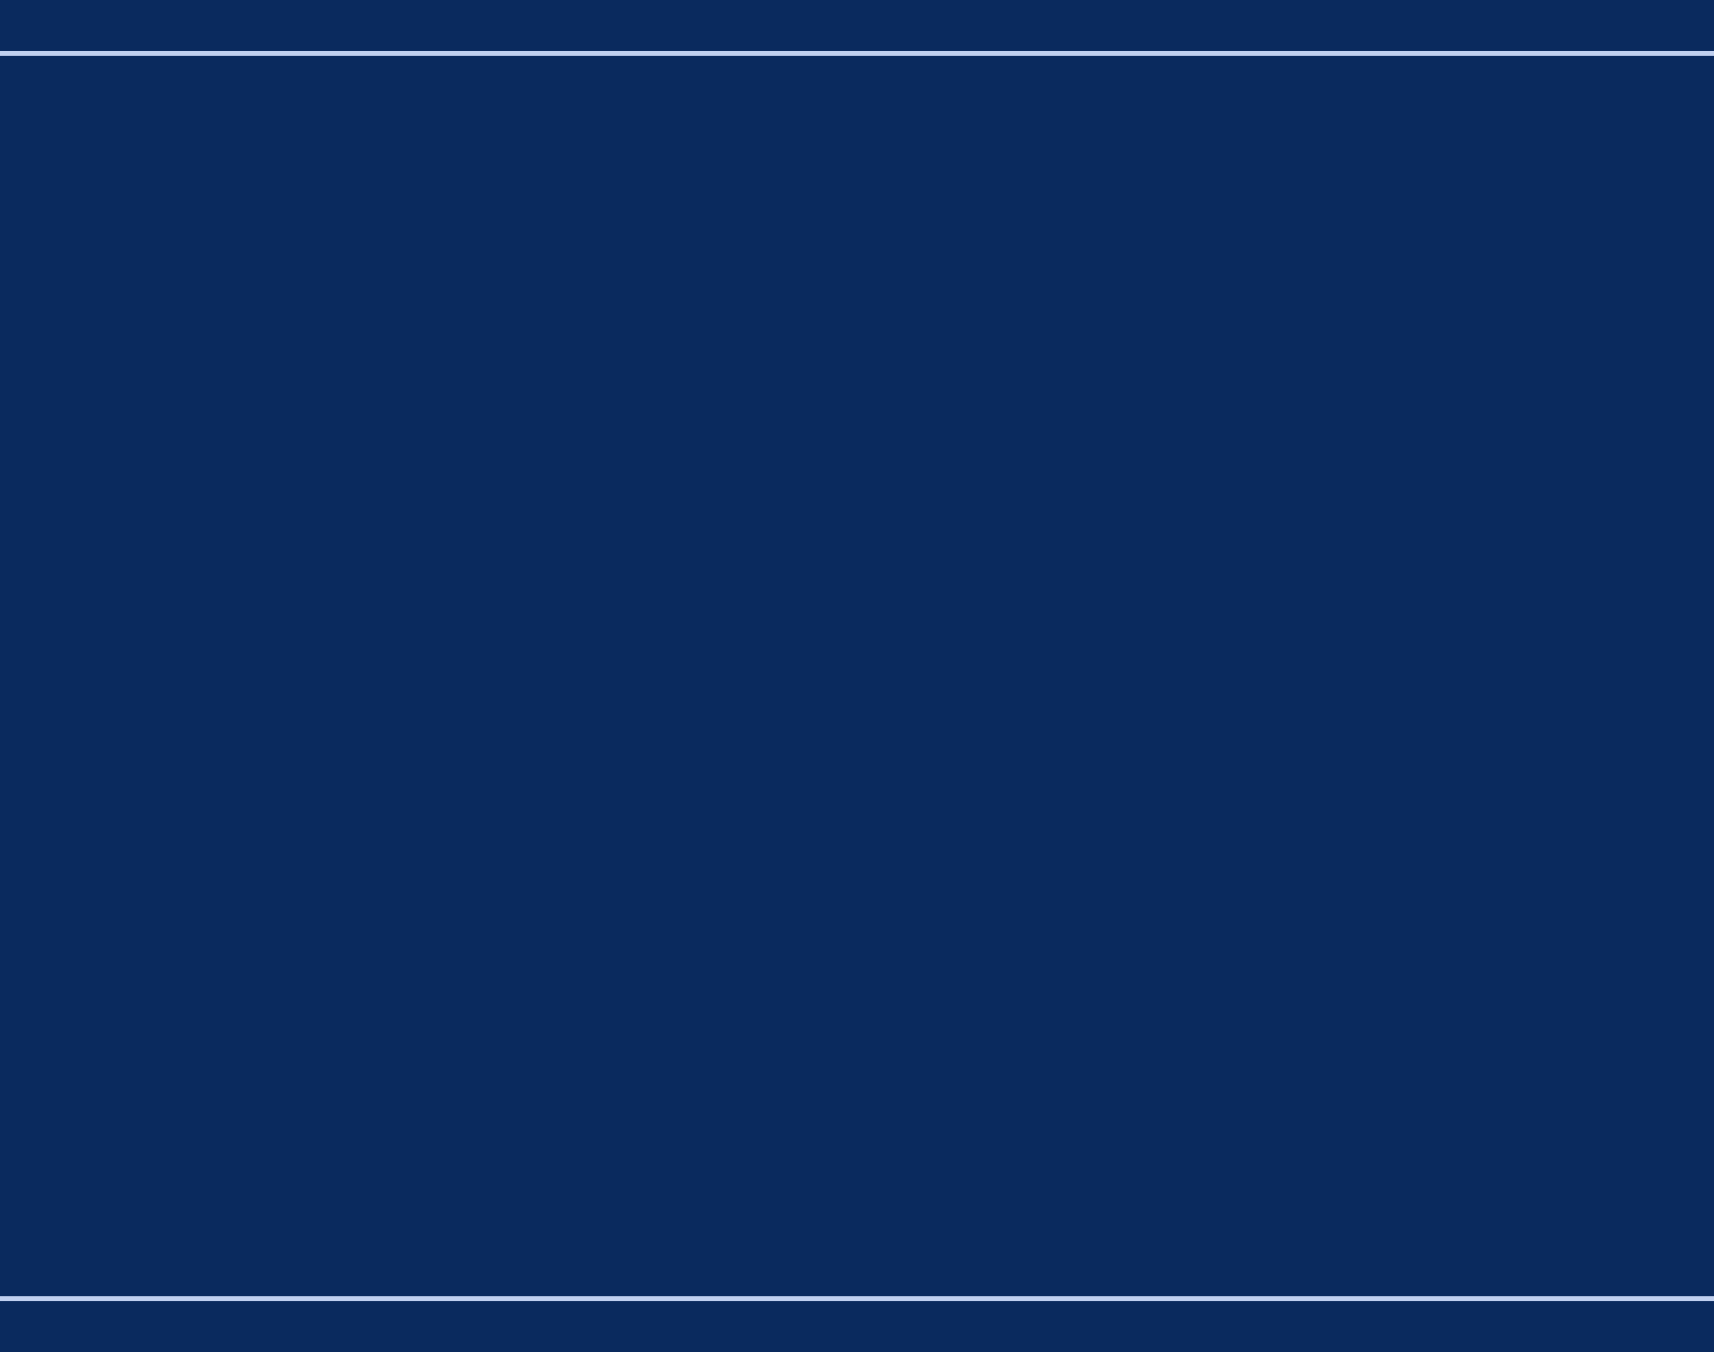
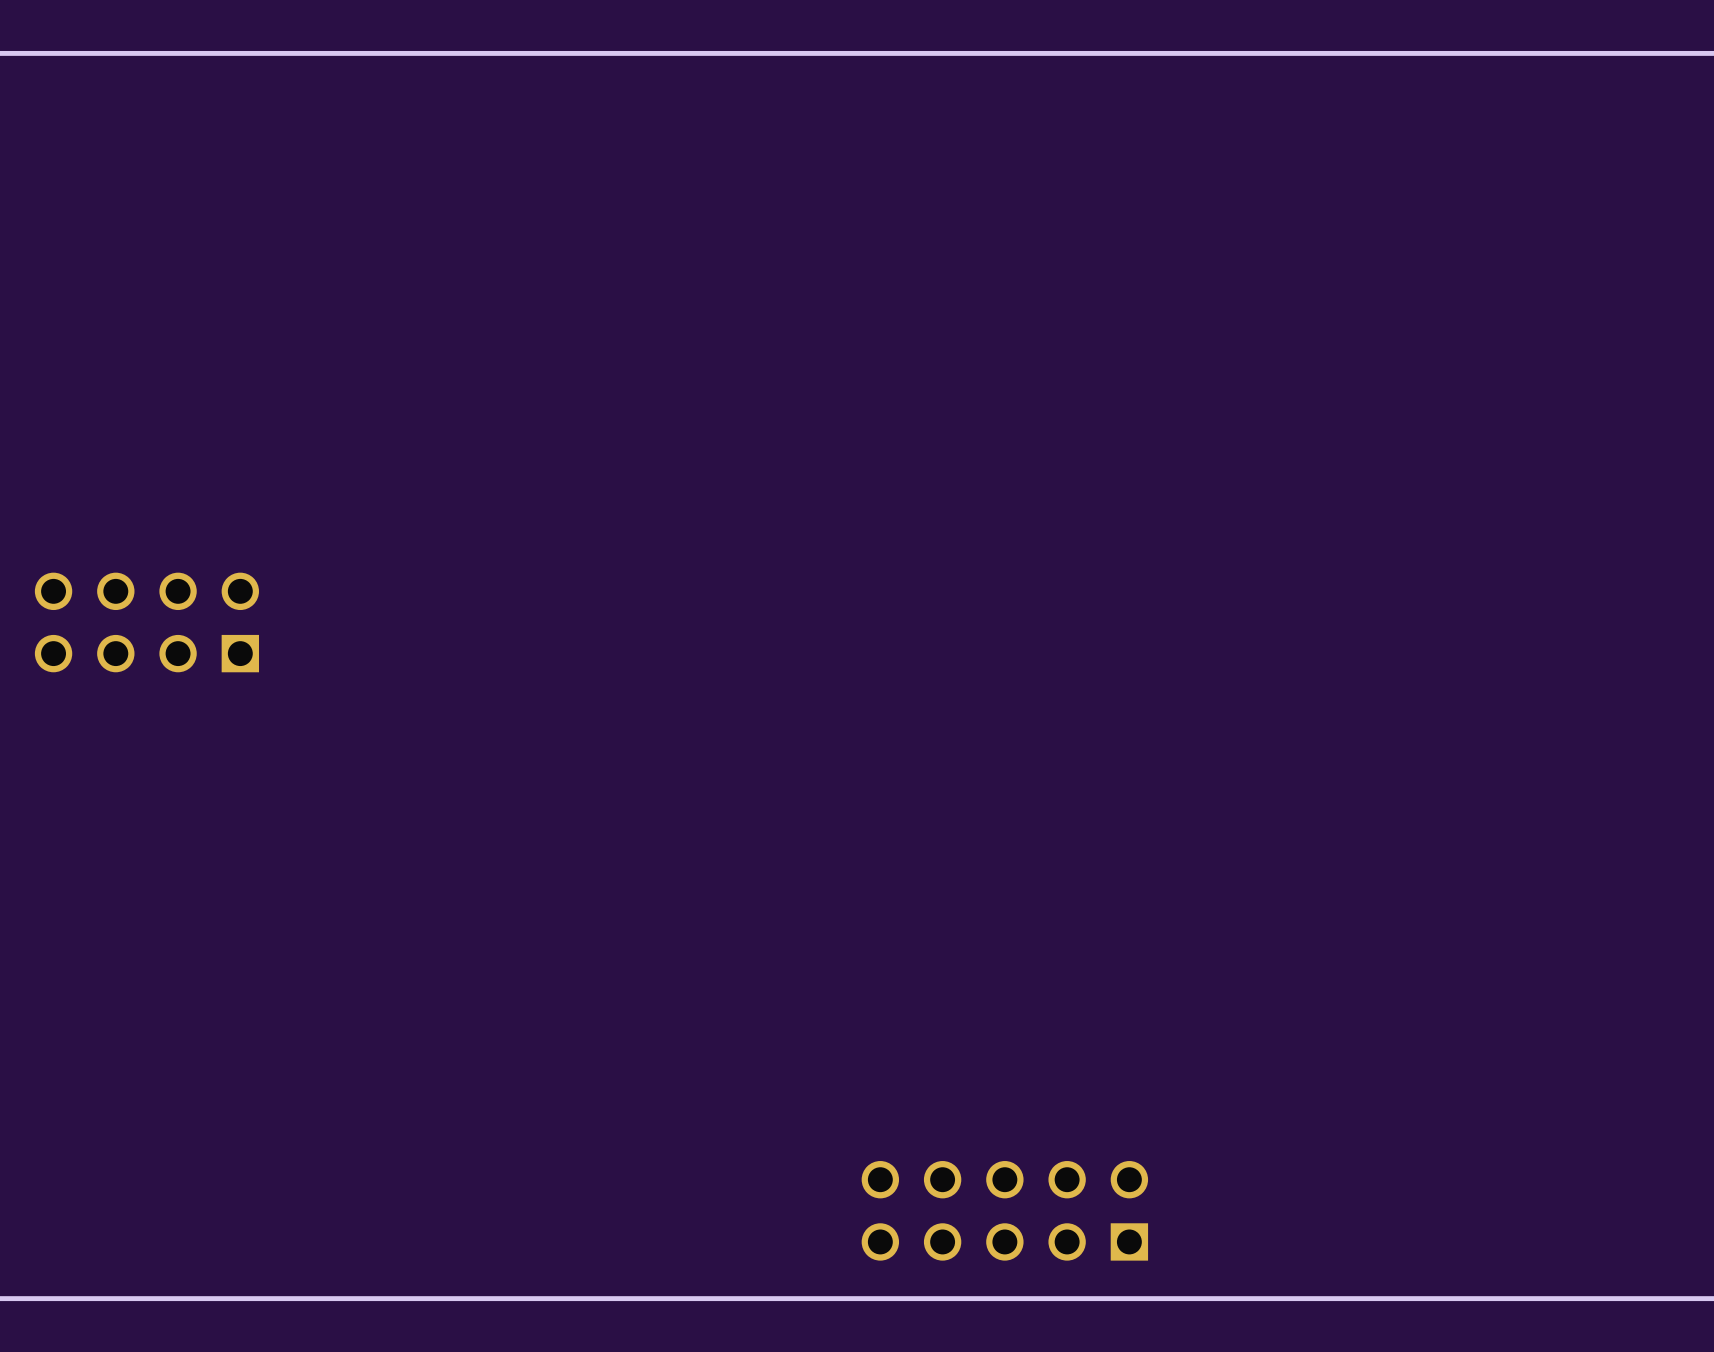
part: none -> (146, 622)
part: none -> (1004, 1210)

